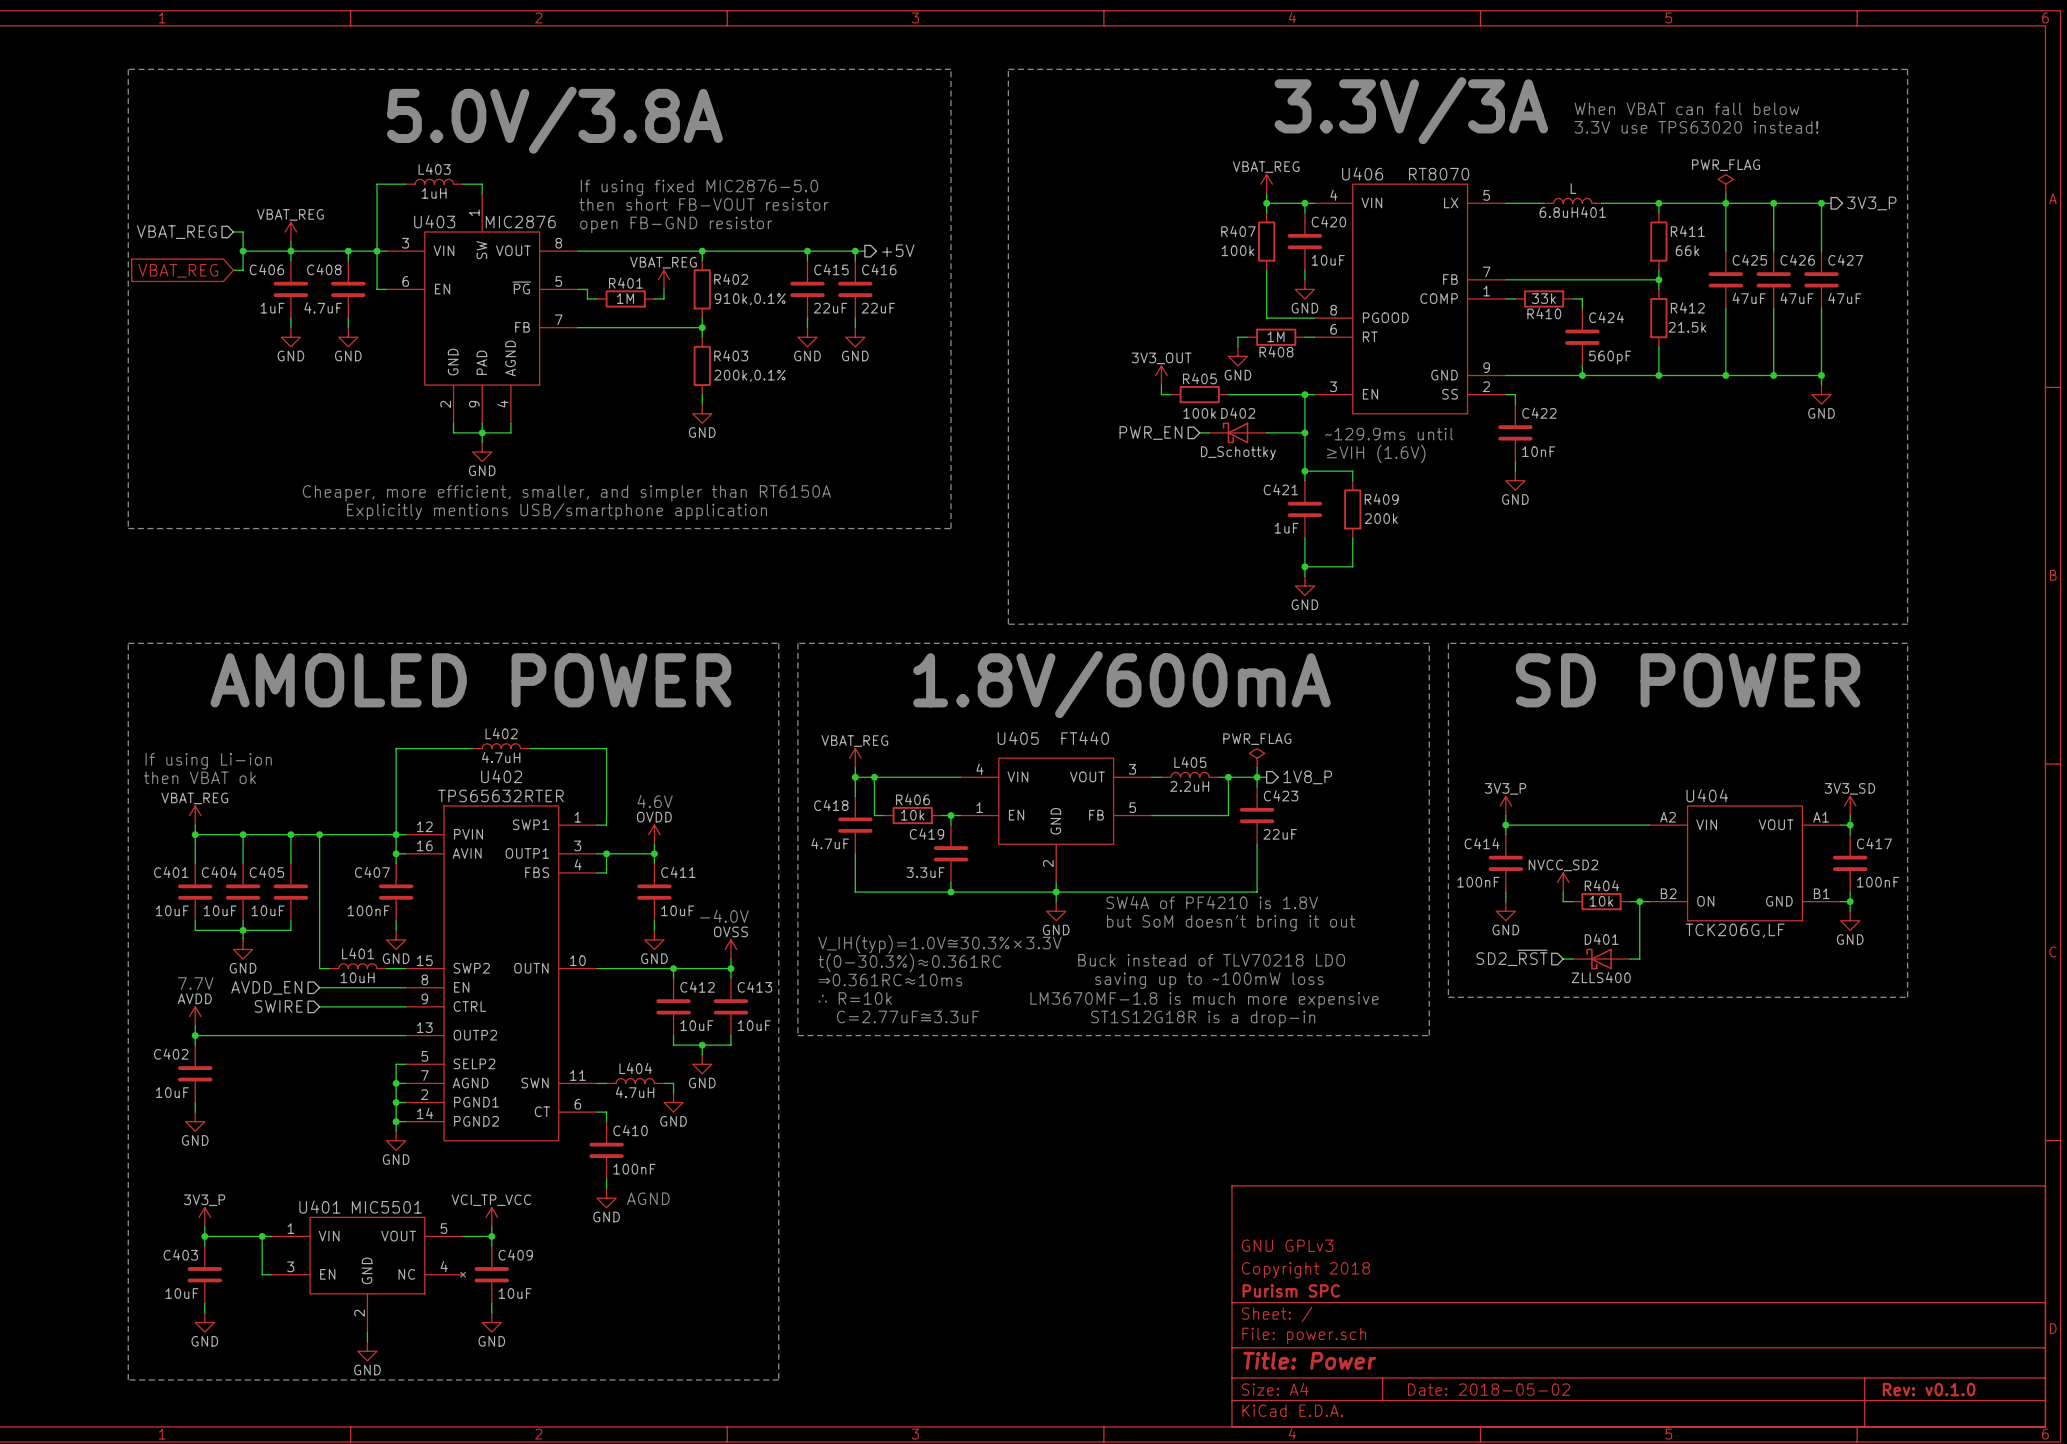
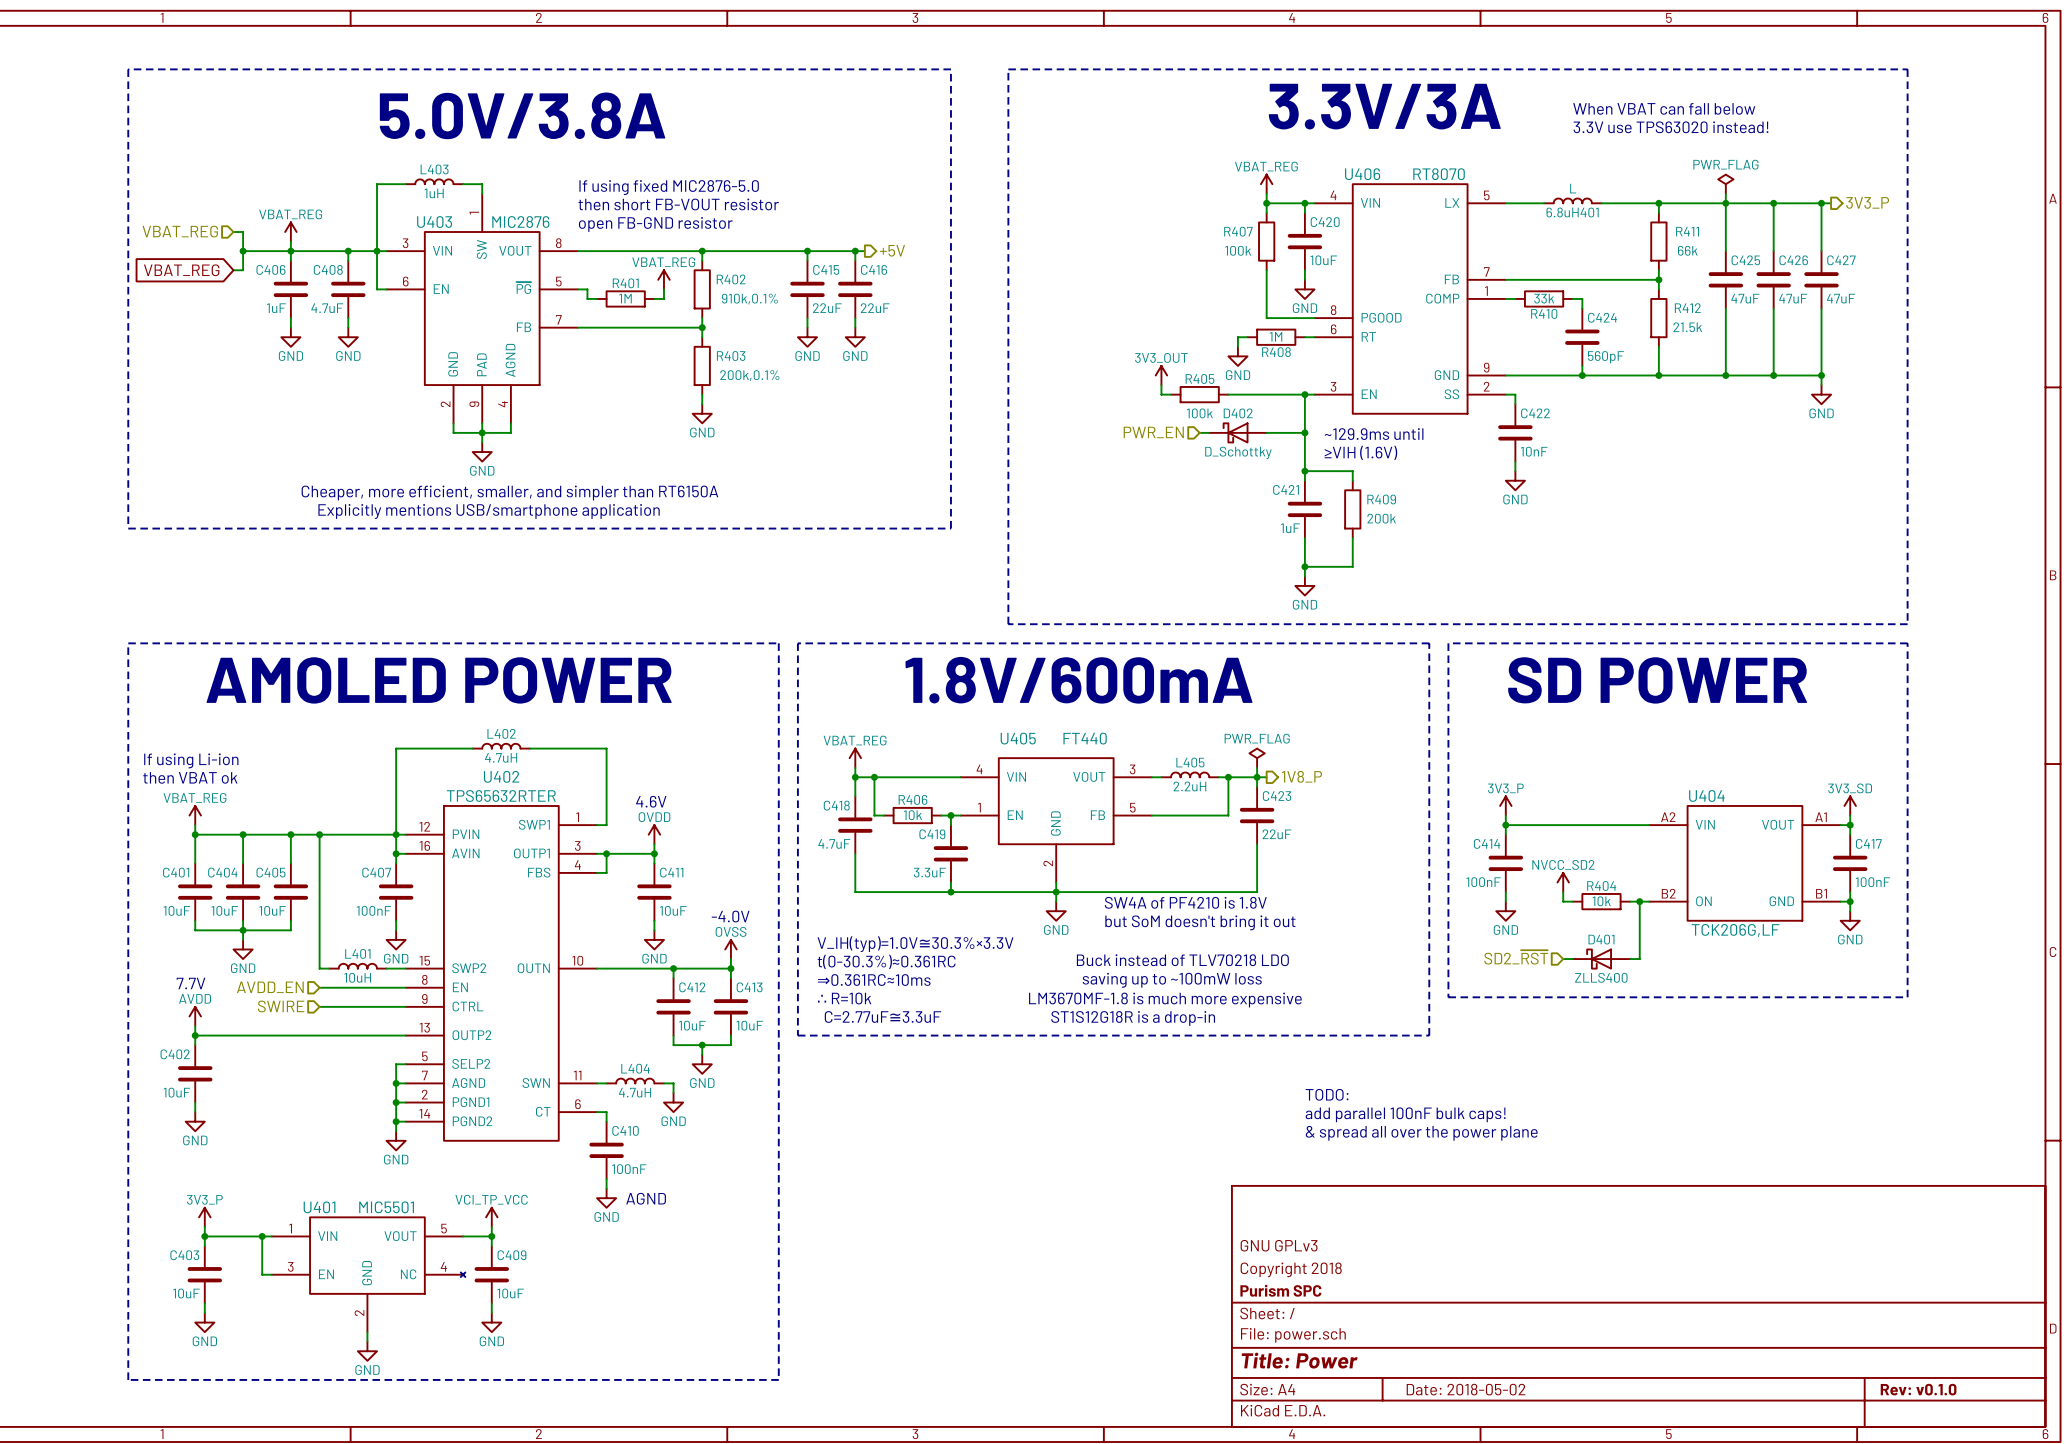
text: none -> TODO: (1327, 1094)
text: none -> add parallel 100nF bulk caps! (1405, 1114)
text: none -> & spread all over the power plane (1421, 1133)

